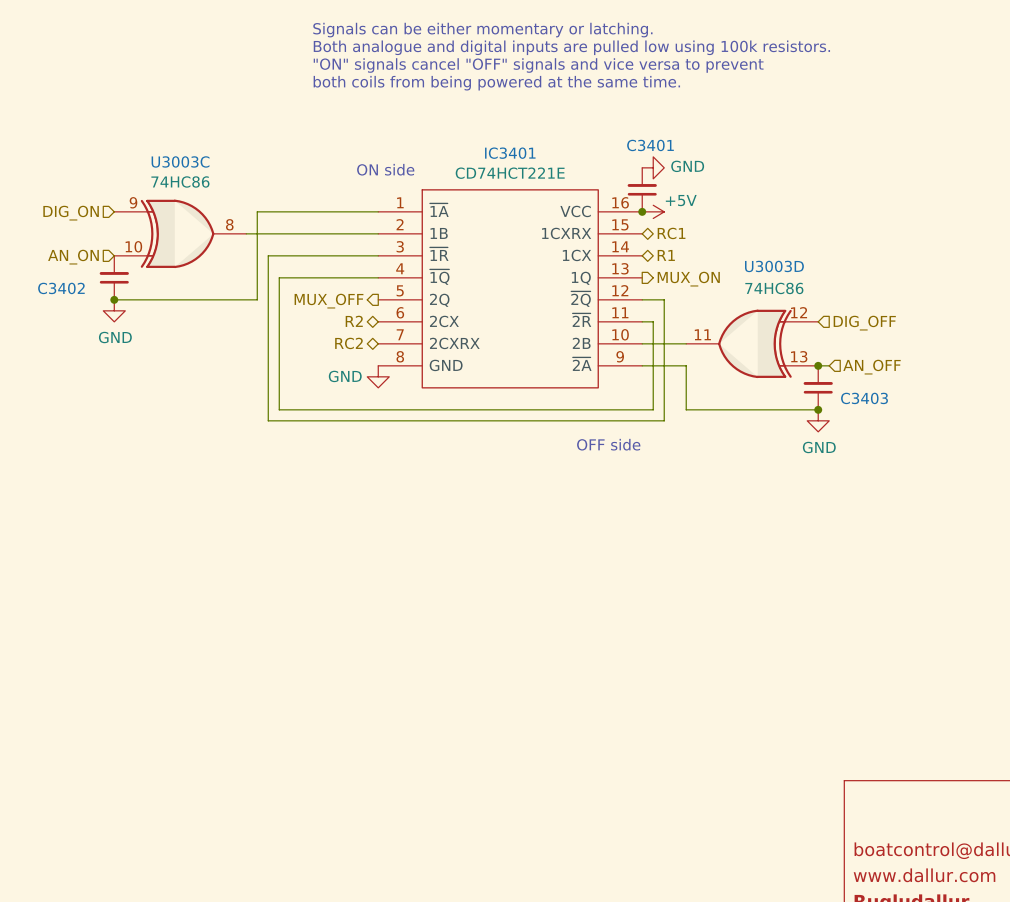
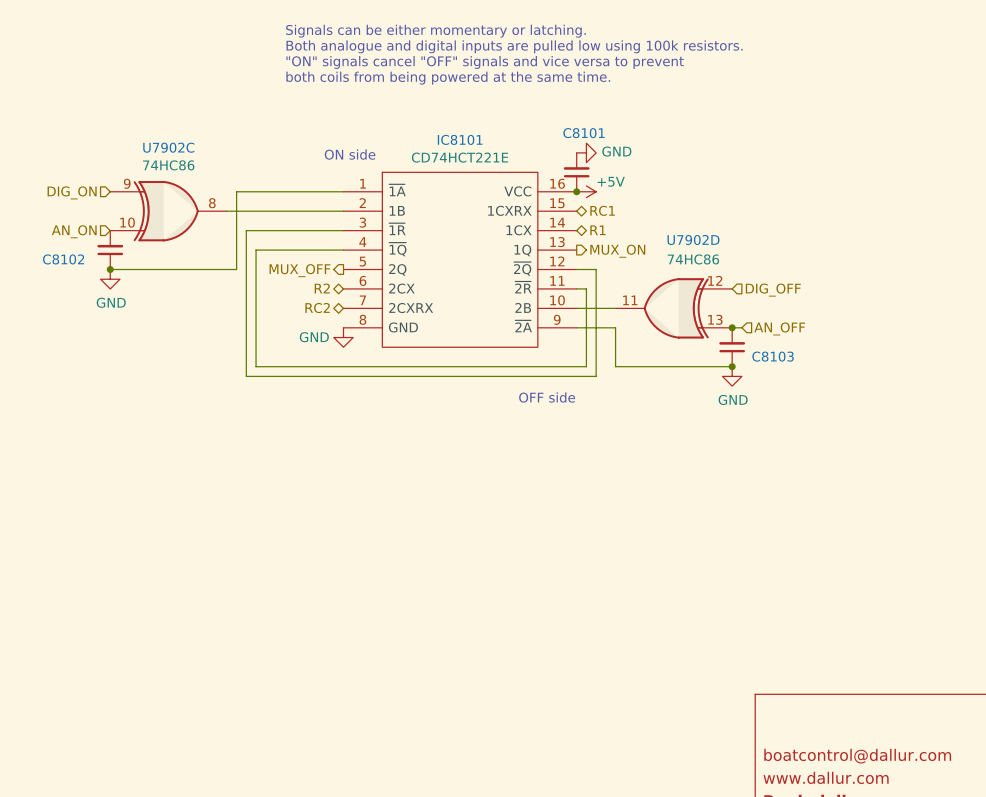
C3401 name: C3401 (650, 145) -> C8101 (584, 133)
IC3401 name: IC3401 (510, 153) -> IC8101 (460, 139)
U3003C name: U3003C (180, 161) -> U7902C (168, 147)
U3003D name: U3003D (774, 266) -> U7902D (693, 240)
C3402 name: C3402 (61, 288) -> C8102 (63, 259)
C3403 name: C3403 (864, 398) -> C8103 (773, 356)

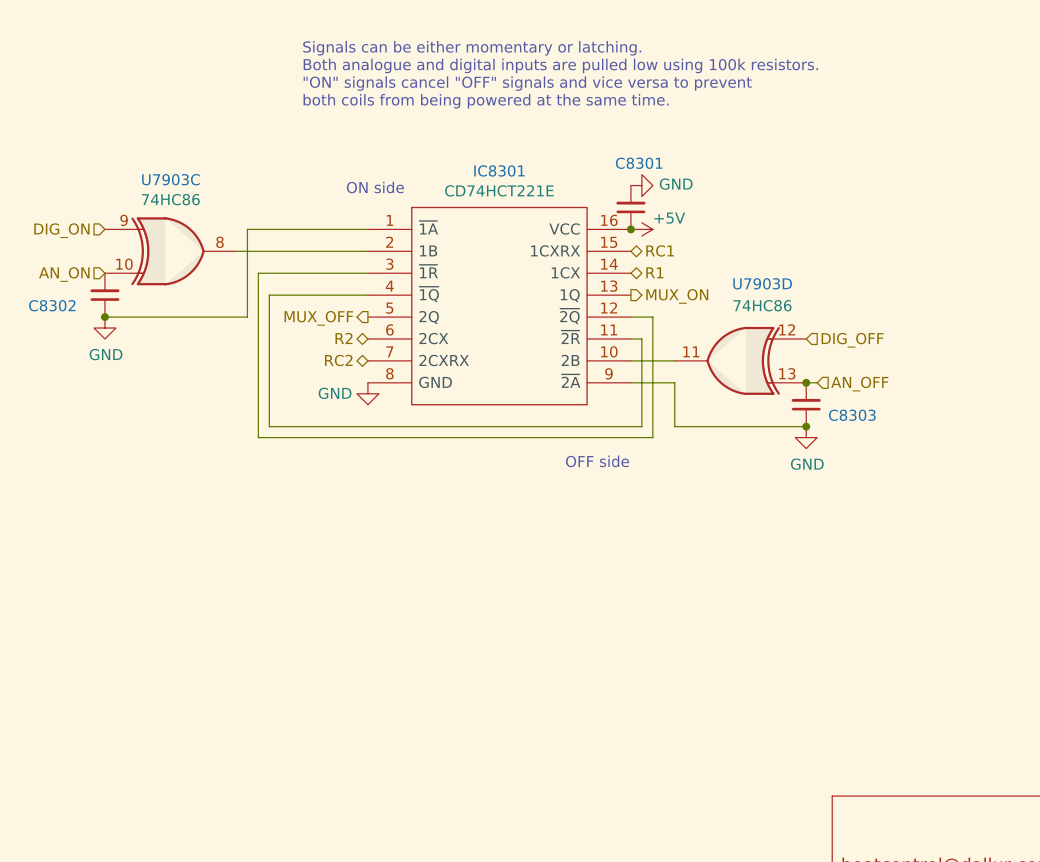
C8101 name: C8101 (584, 133) -> C8301 (639, 163)
IC8101 name: IC8101 (460, 139) -> IC8301 (499, 170)
U7902C name: U7902C (168, 147) -> U7903C (170, 179)
U7902D name: U7902D (693, 240) -> U7903D (762, 283)
C8102 name: C8102 (63, 259) -> C8302 (52, 305)
C8103 name: C8103 (773, 356) -> C8303 (852, 415)

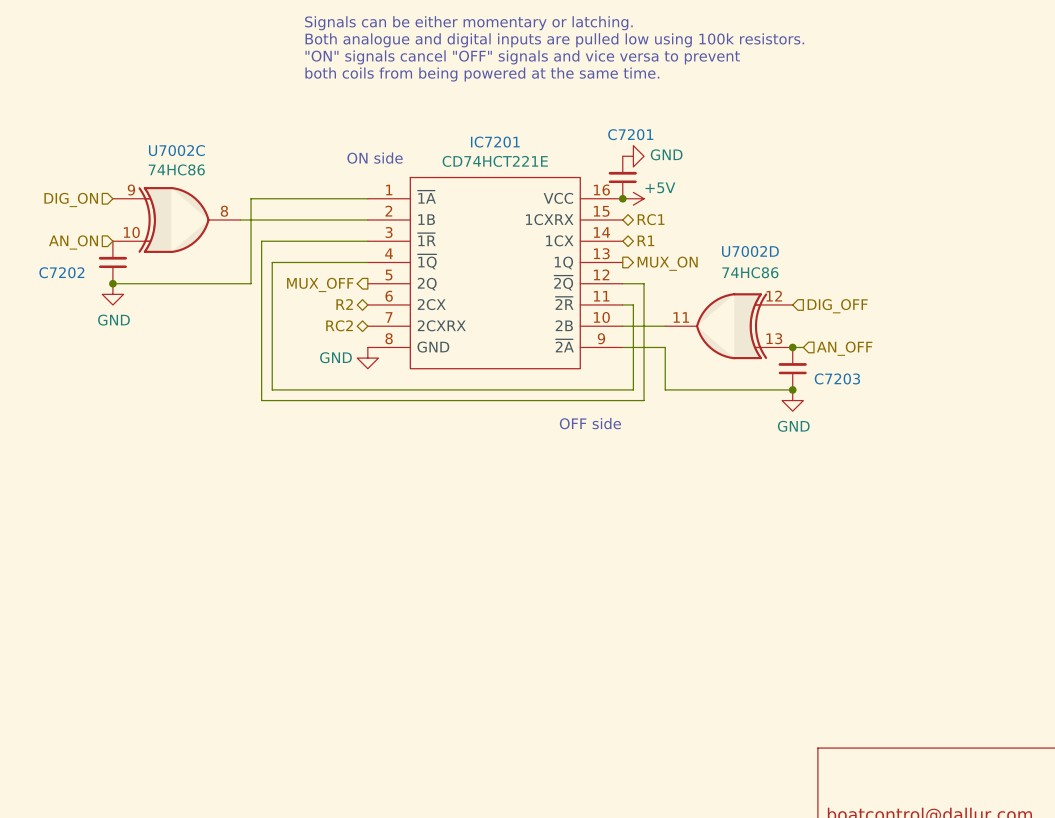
C8301 name: C8301 (639, 163) -> C7201 (630, 134)
IC8301 name: IC8301 (499, 170) -> IC7201 (495, 142)
U7903C name: U7903C (170, 179) -> U7002C (176, 150)
U7903D name: U7903D (762, 283) -> U7002D (750, 251)
C8302 name: C8302 (52, 305) -> C7202 (61, 272)
C8303 name: C8303 (852, 415) -> C7203 (837, 378)

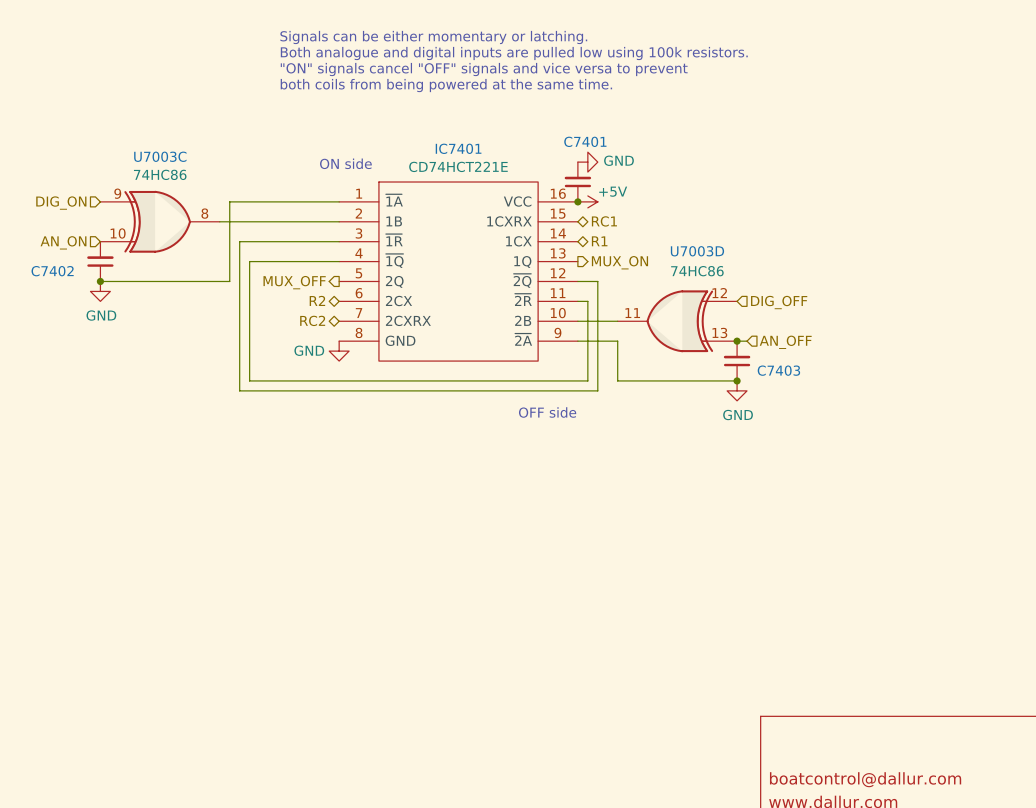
C7201 name: C7201 (630, 134) -> C7401 (585, 141)
IC7201 name: IC7201 (495, 142) -> IC7401 (458, 148)
U7002C name: U7002C (176, 150) -> U7003C (160, 156)
U7002D name: U7002D (750, 251) -> U7003D (697, 251)
C7202 name: C7202 (61, 272) -> C7402 (52, 271)
C7203 name: C7203 (837, 378) -> C7403 (778, 370)

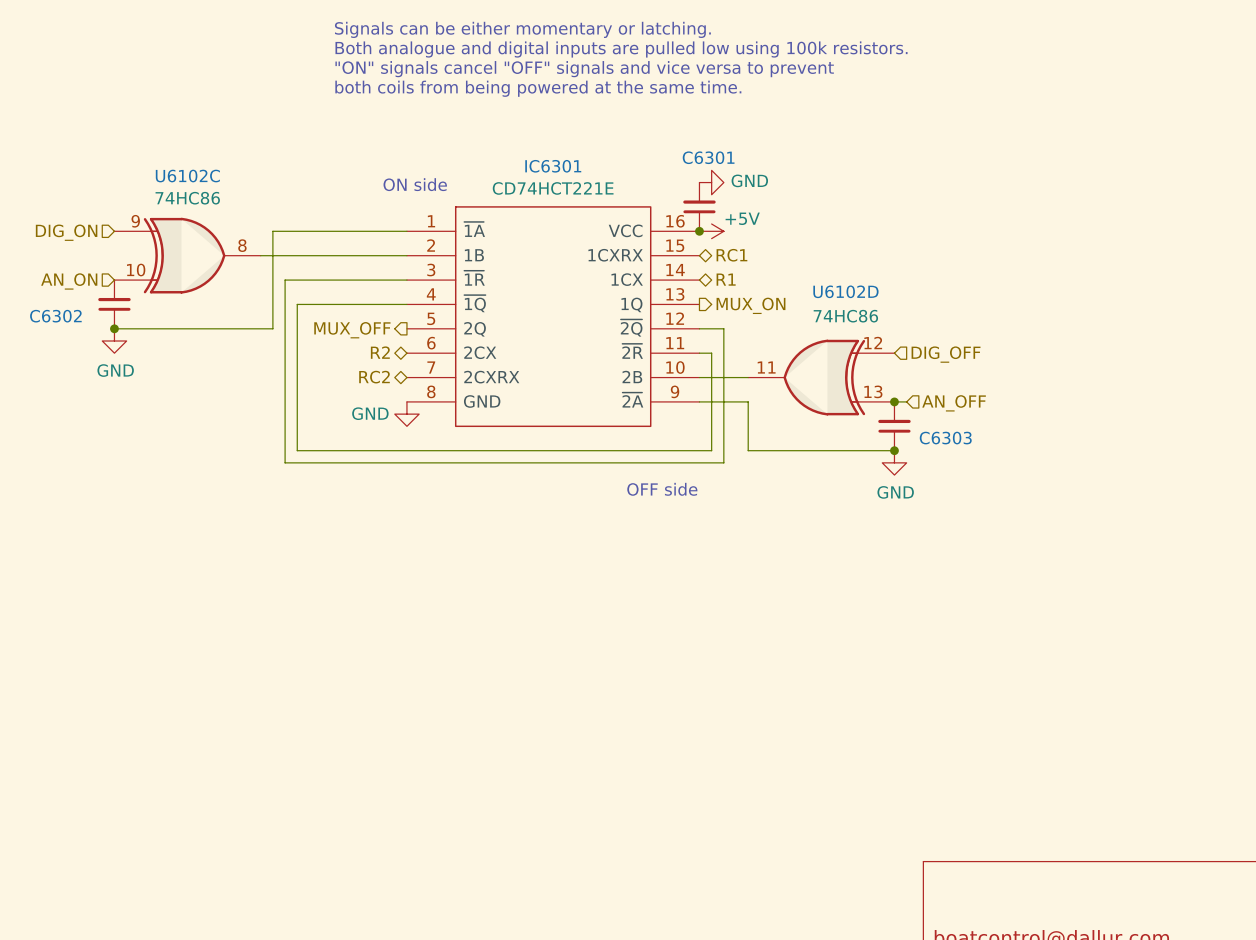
C7401 name: C7401 (585, 141) -> C6301 (708, 157)
IC7401 name: IC7401 (458, 148) -> IC6301 (553, 166)
U7003C name: U7003C (160, 156) -> U6102C (187, 176)
U7003D name: U7003D (697, 251) -> U6102D (845, 291)
C7402 name: C7402 (52, 271) -> C6302 (55, 316)
C7403 name: C7403 (778, 370) -> C6303 (945, 438)

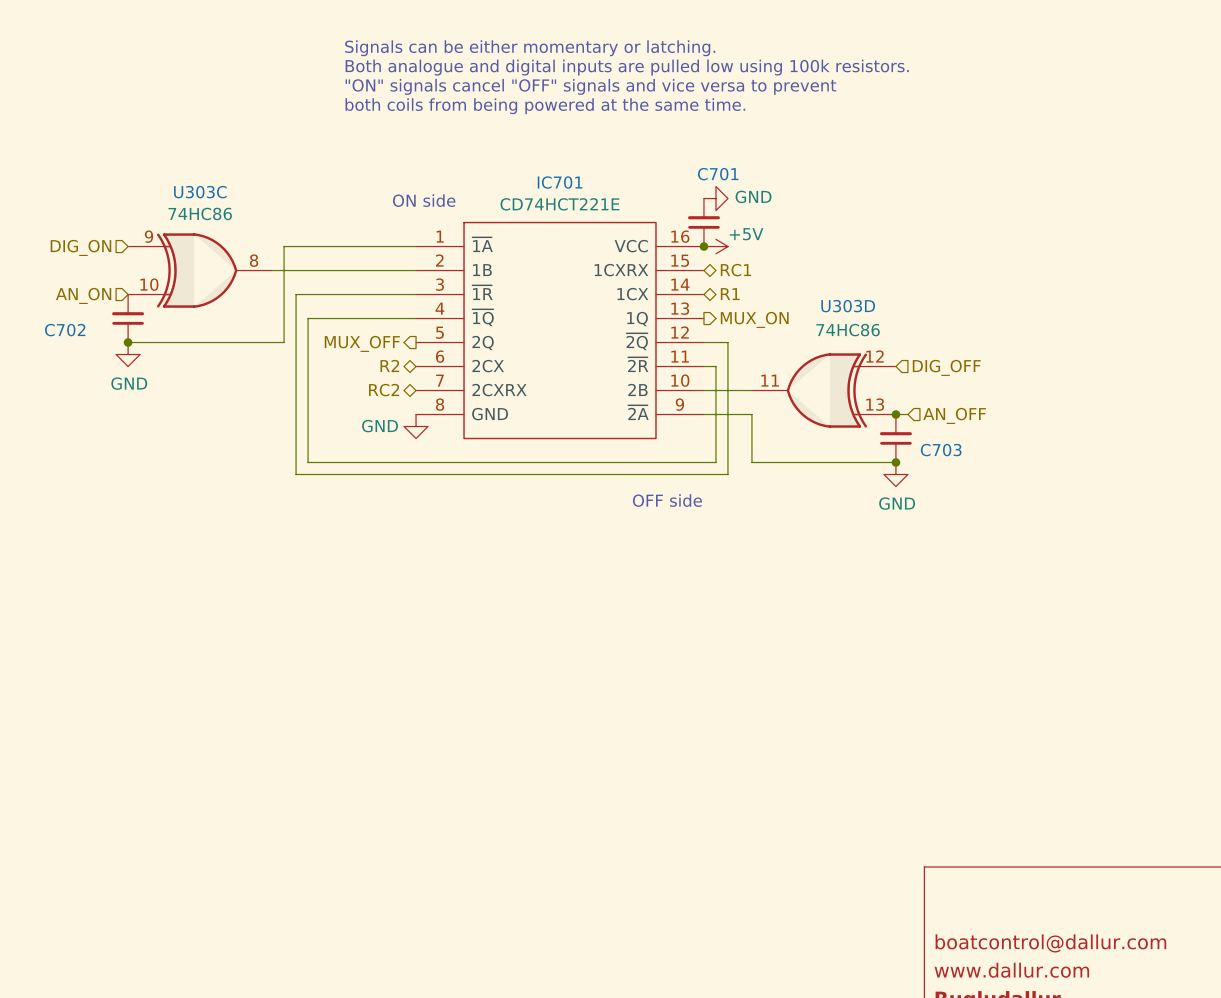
C6301 name: C6301 (708, 157) -> C701 (718, 174)
IC6301 name: IC6301 (553, 166) -> IC701 (560, 182)
U6102C name: U6102C (187, 176) -> U303C (200, 192)
U6102D name: U6102D (845, 291) -> U303D (848, 306)
C6302 name: C6302 (55, 316) -> C702 (65, 330)
C6303 name: C6303 (945, 438) -> C703 (941, 450)

